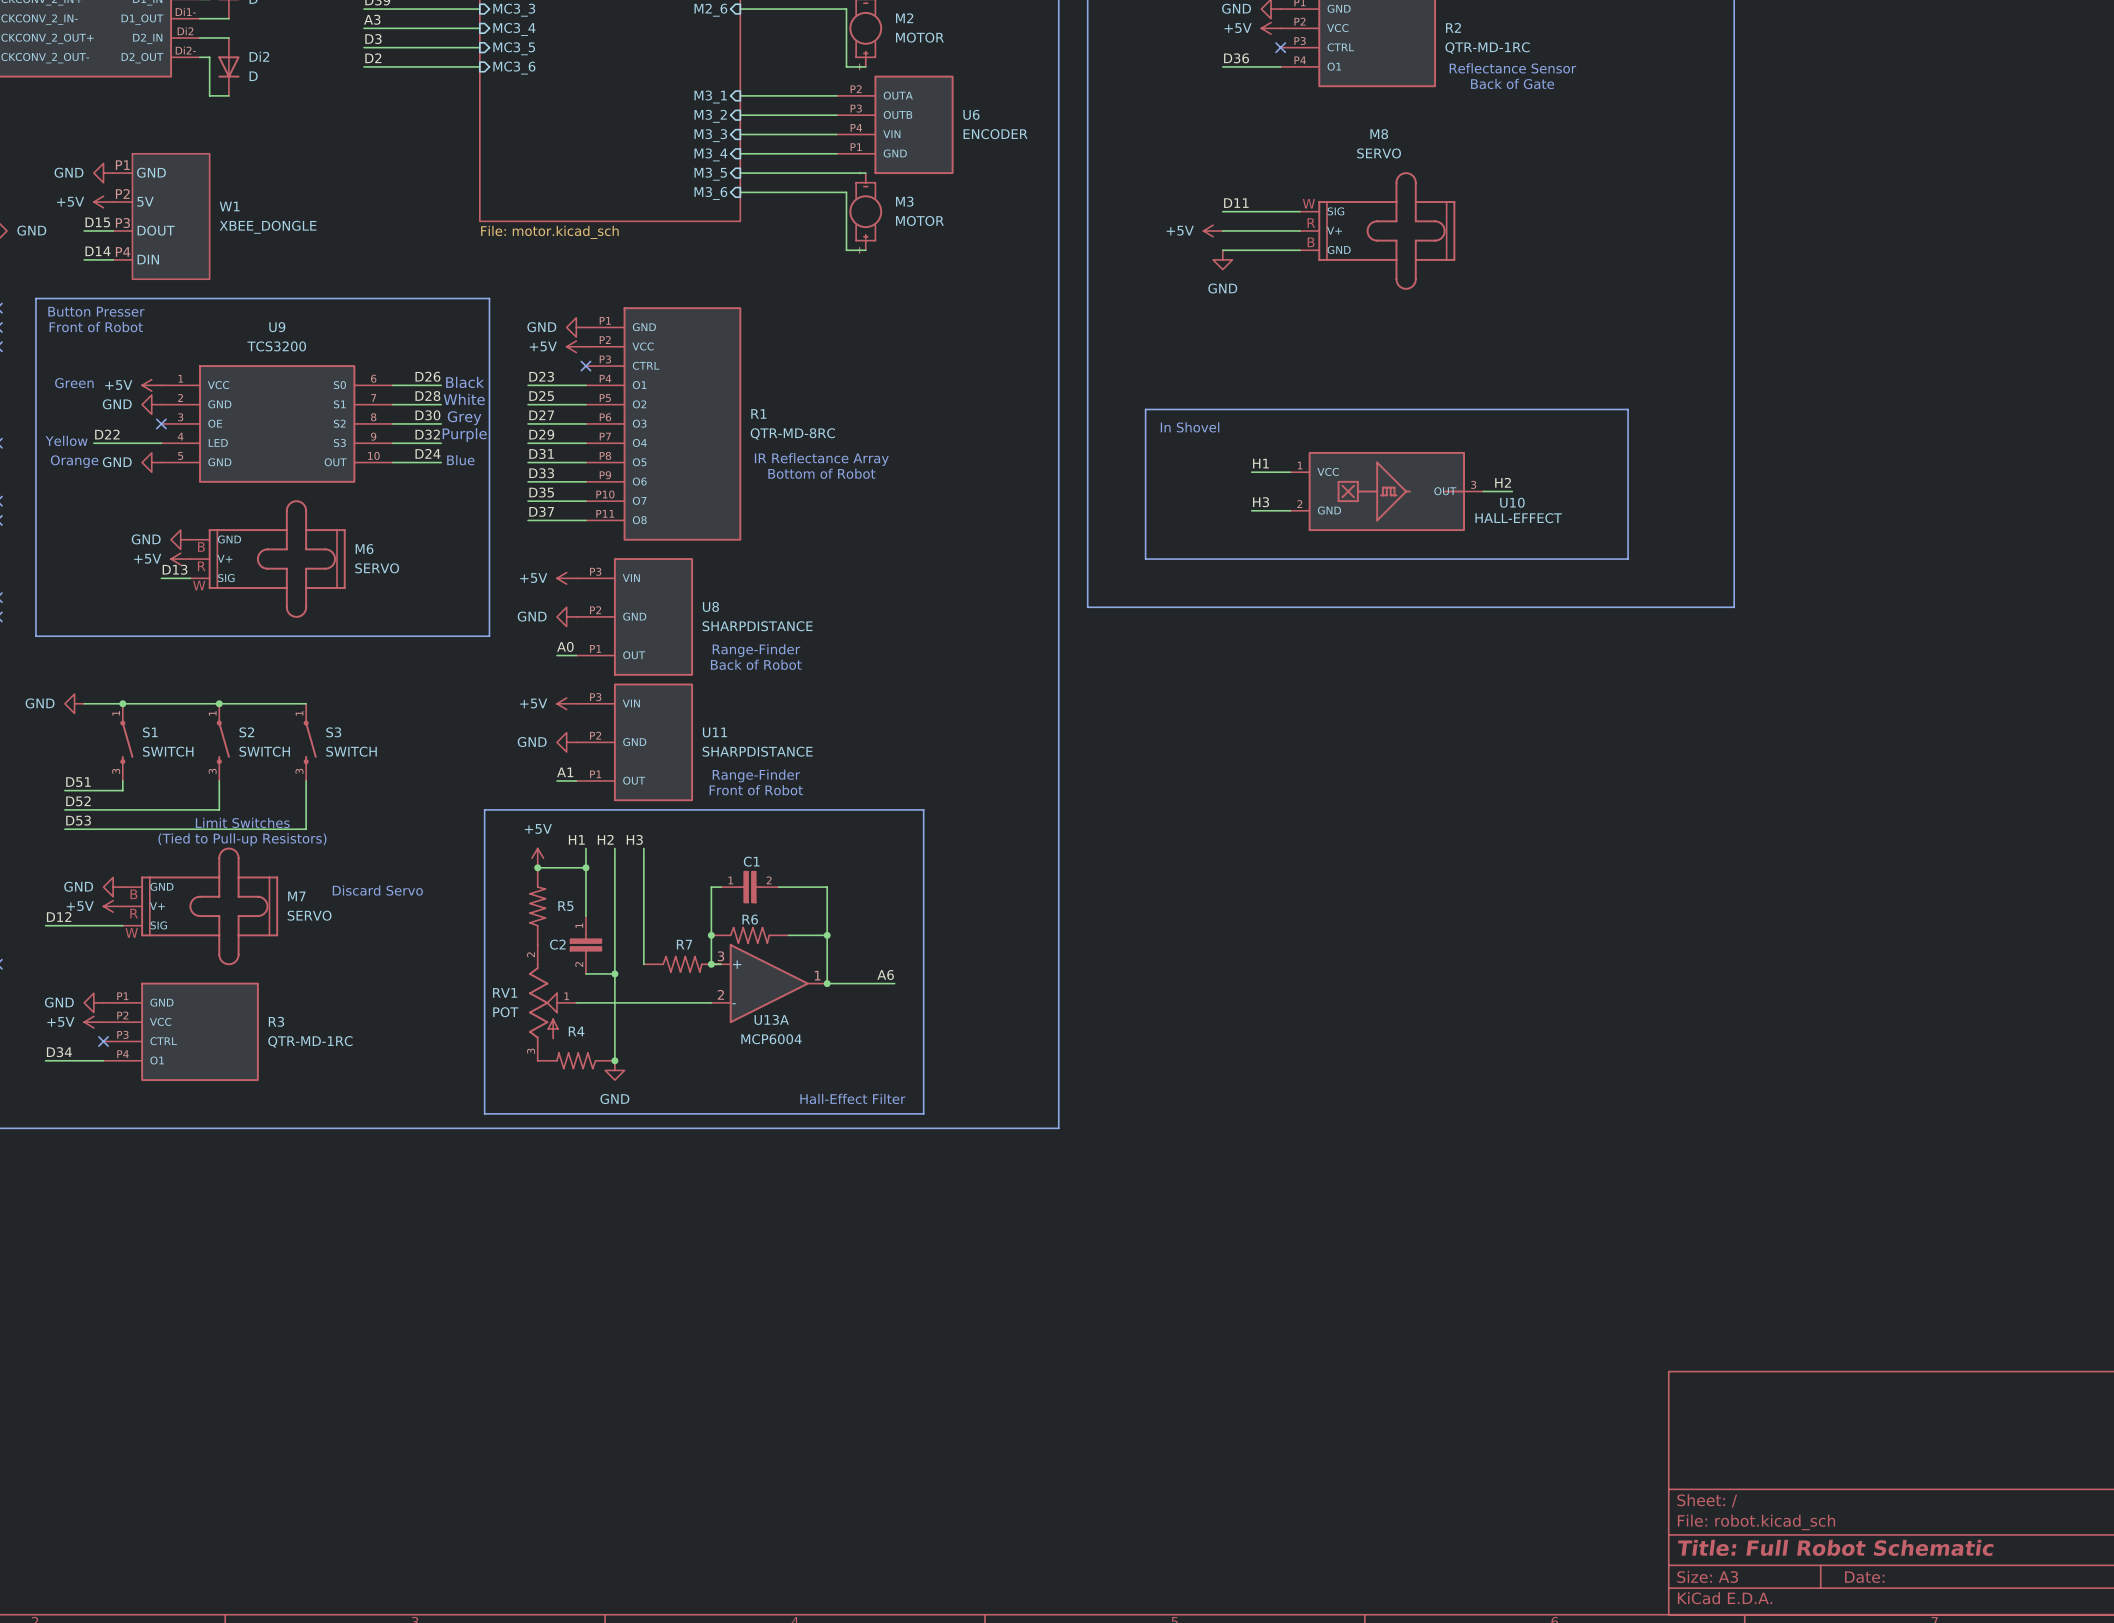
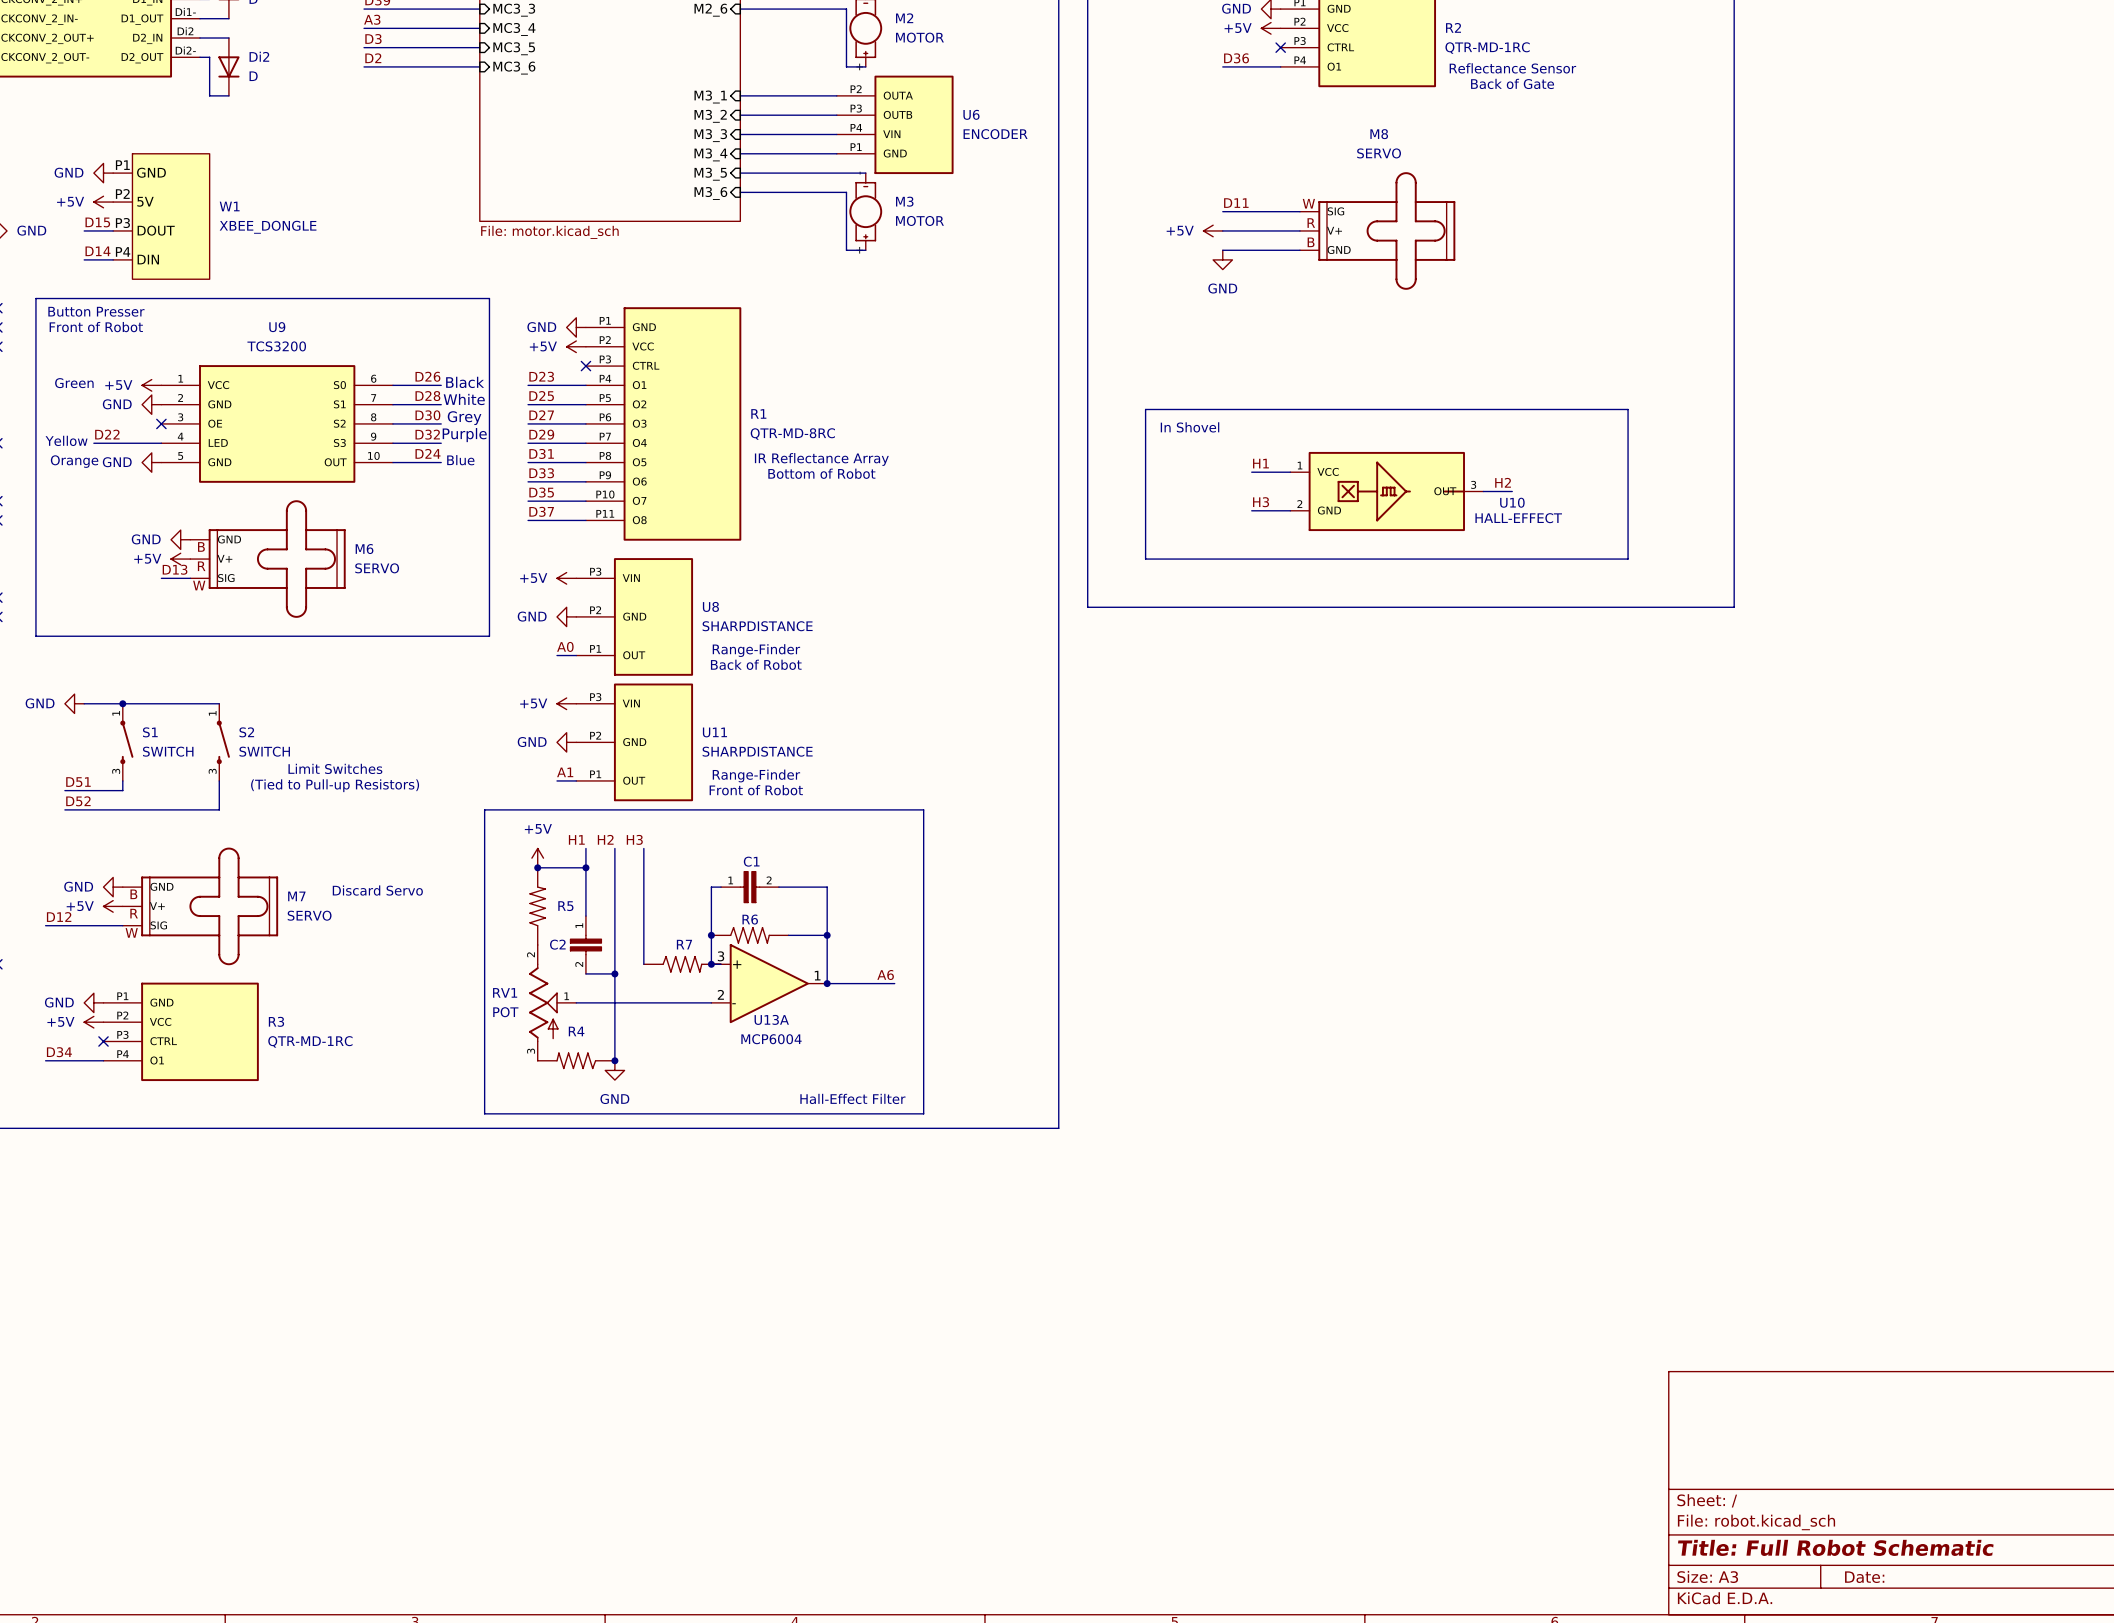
wire: (219, 703) (306, 703) -> none
junction: (219, 703) -> none
S3: SWITCH (310, 742) -> none
wire: (306, 780) (306, 829) (64, 829) -> none
label: D53 (78, 820) -> none
text position: Limit Switches (242, 822) -> Limit Switches (335, 768)
text position: (Tied to Pull-up Resistors) (242, 839) -> (Tied to Pull-up Resistors) (335, 785)

